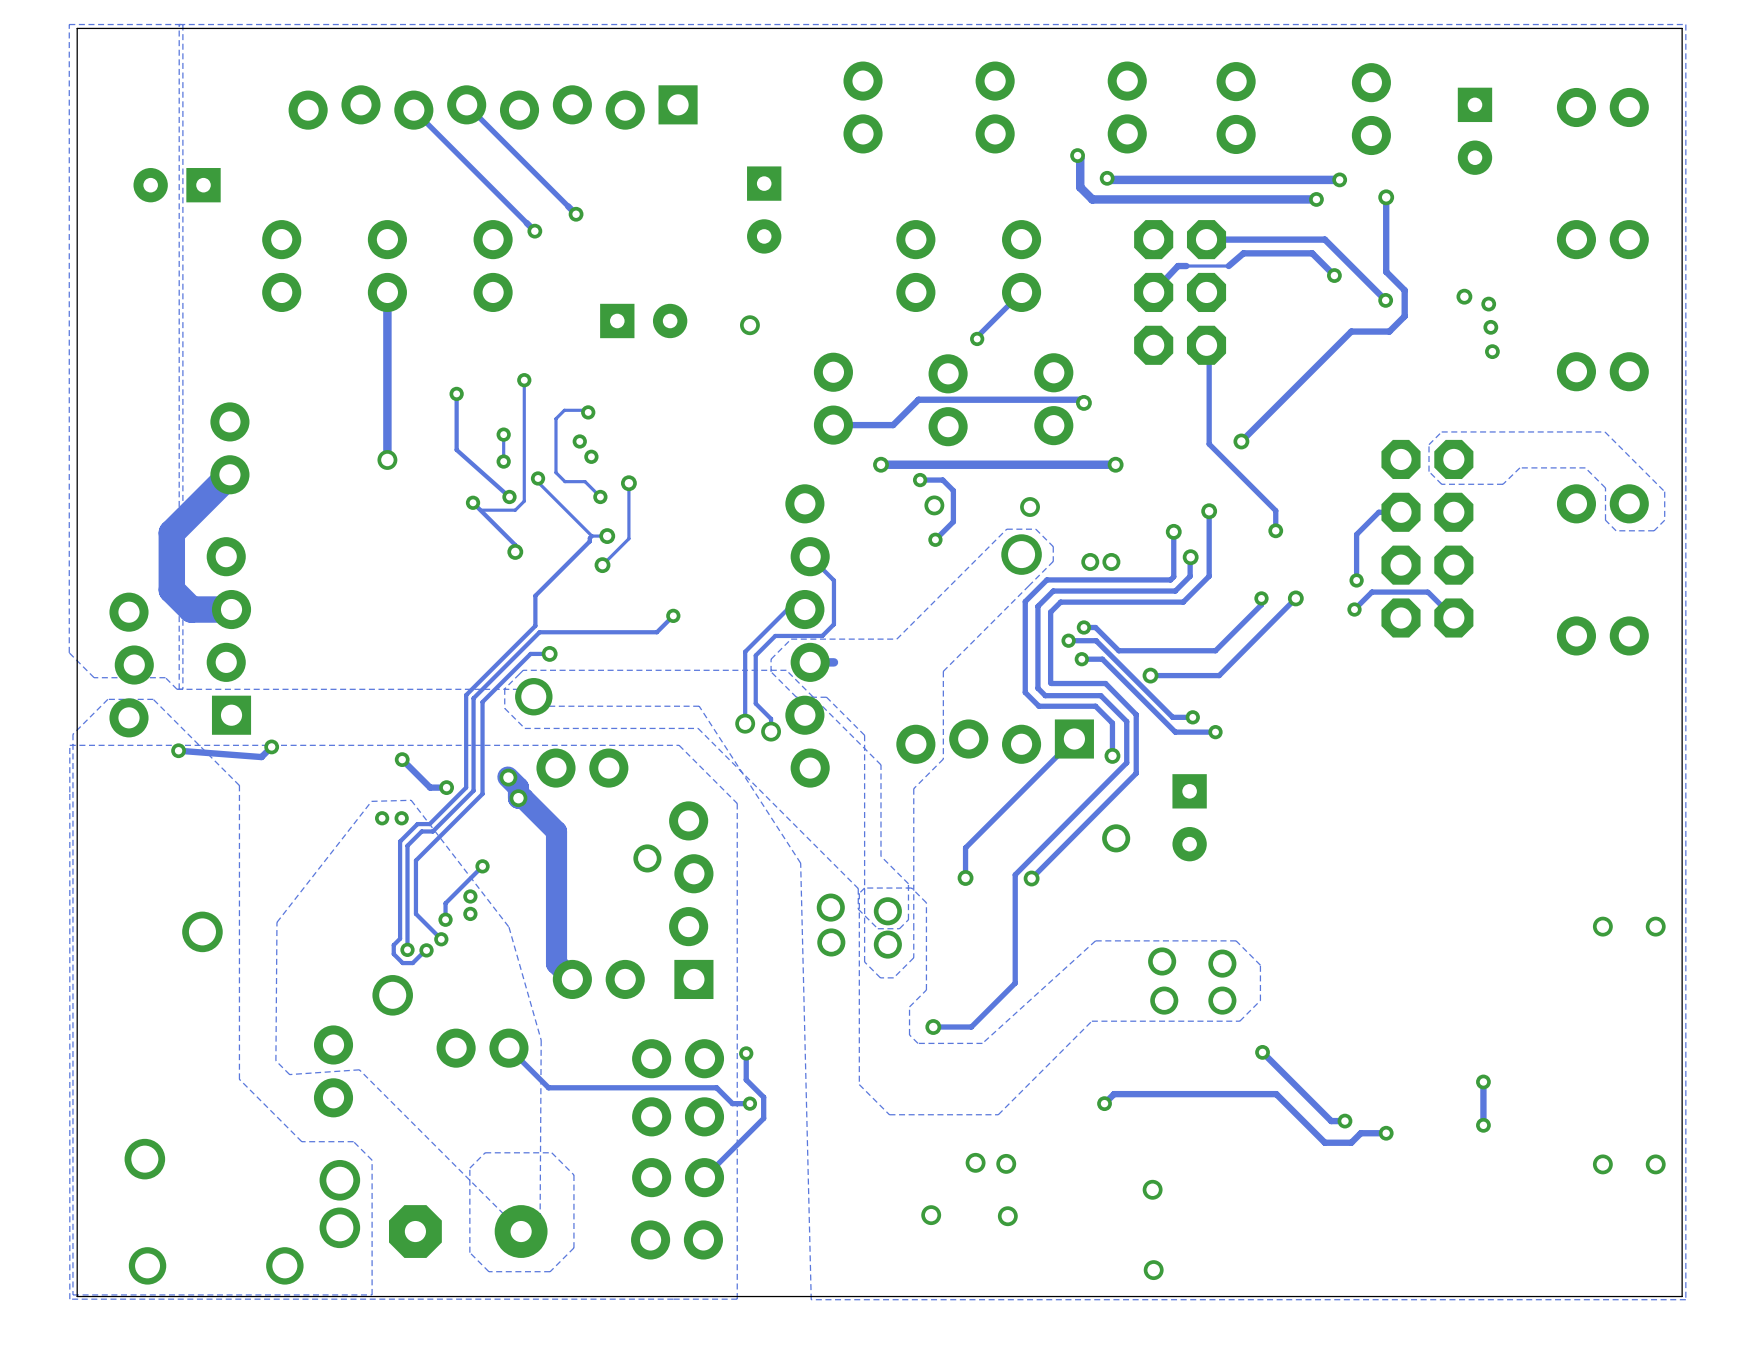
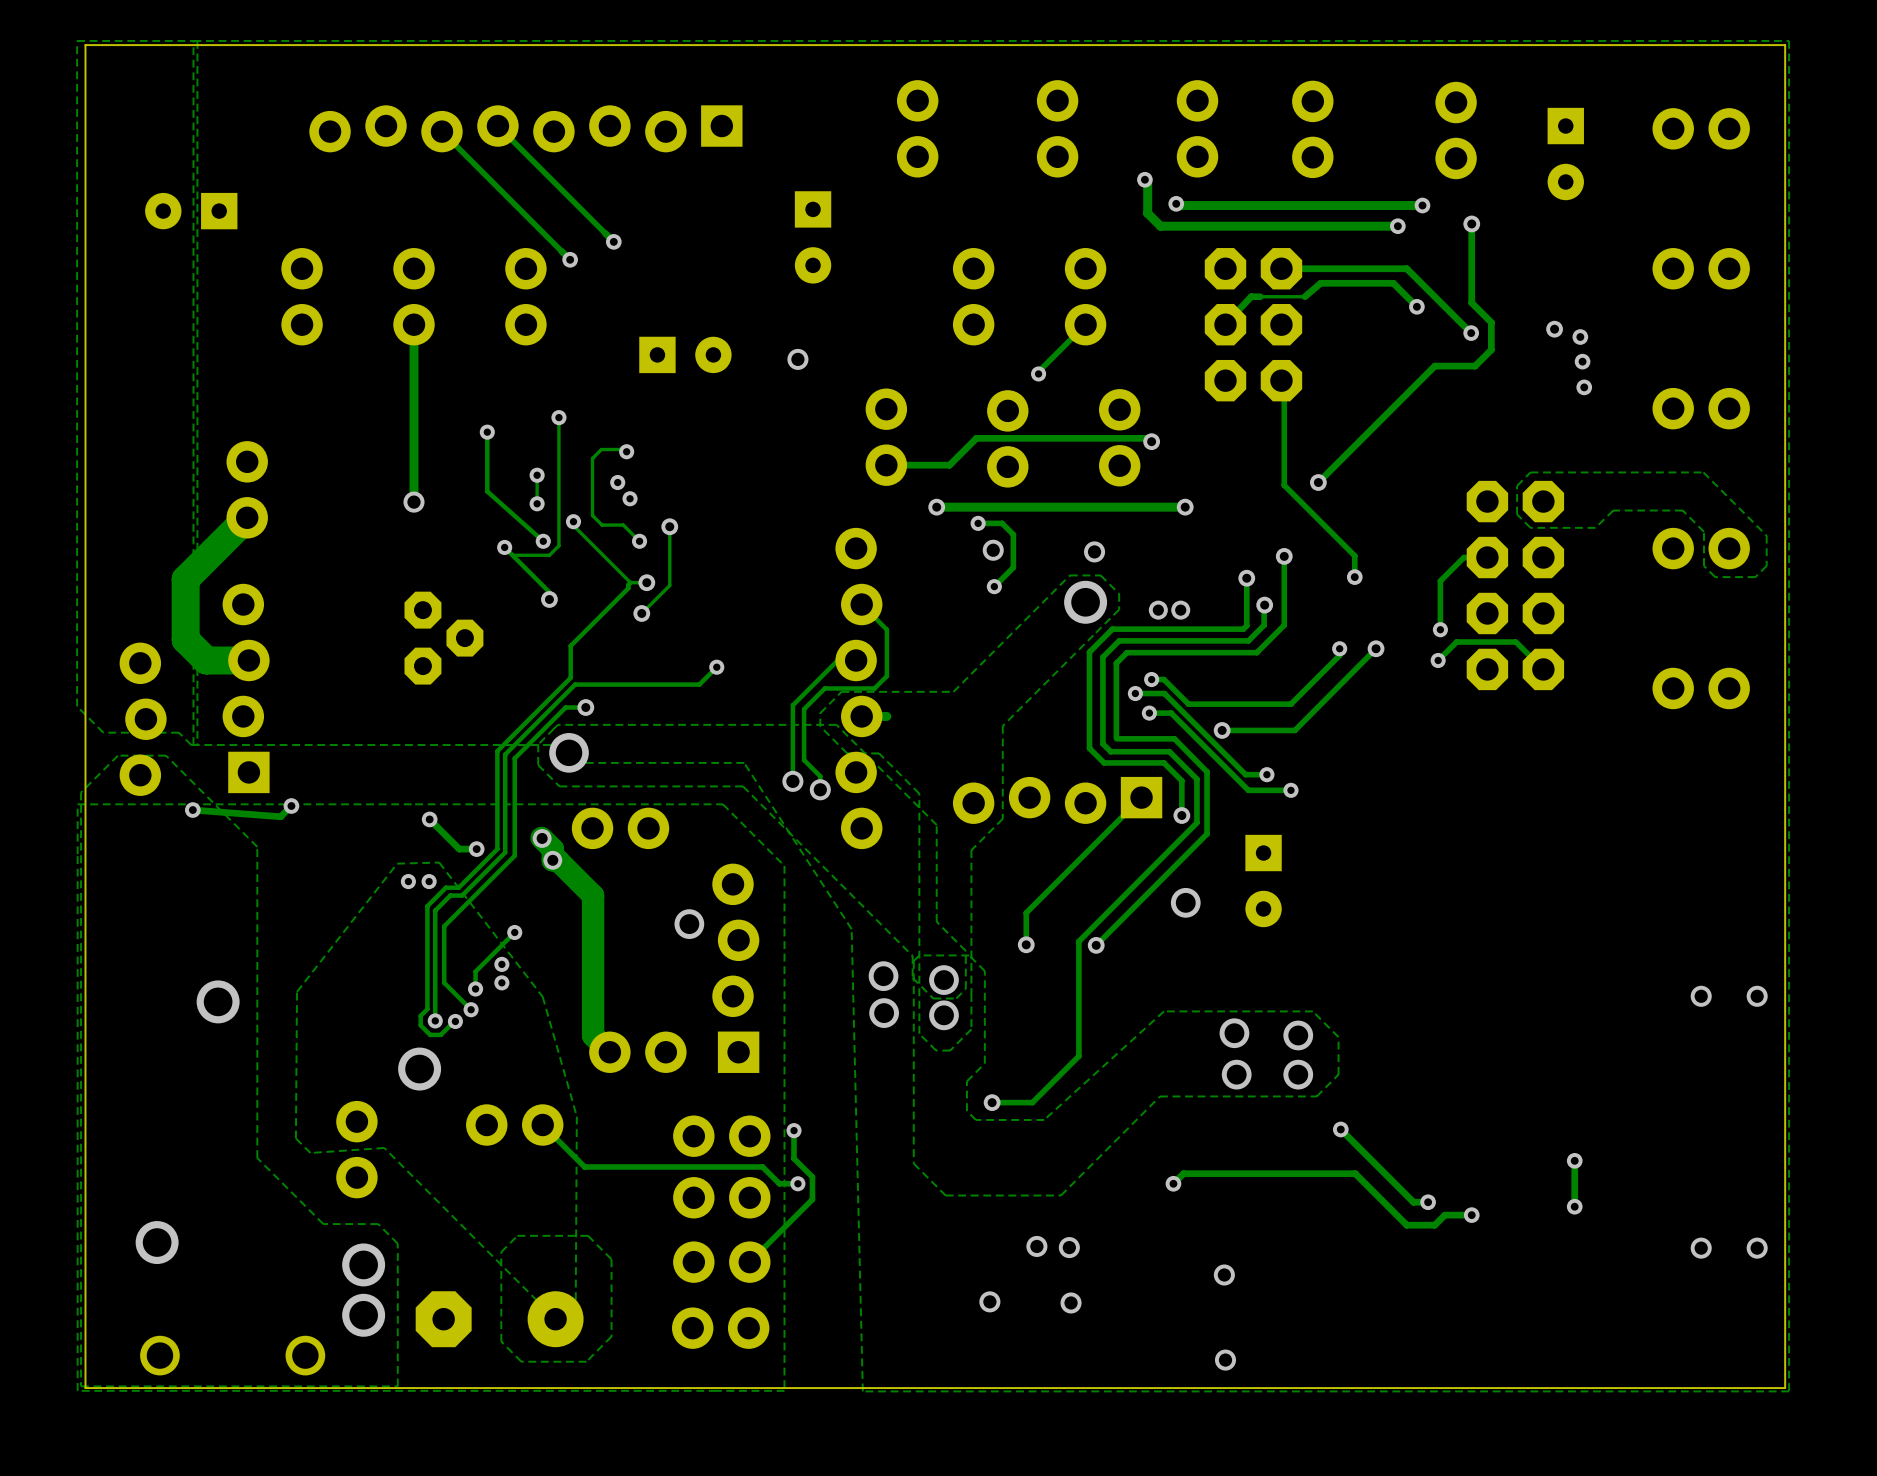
part: none -> (443, 638)

